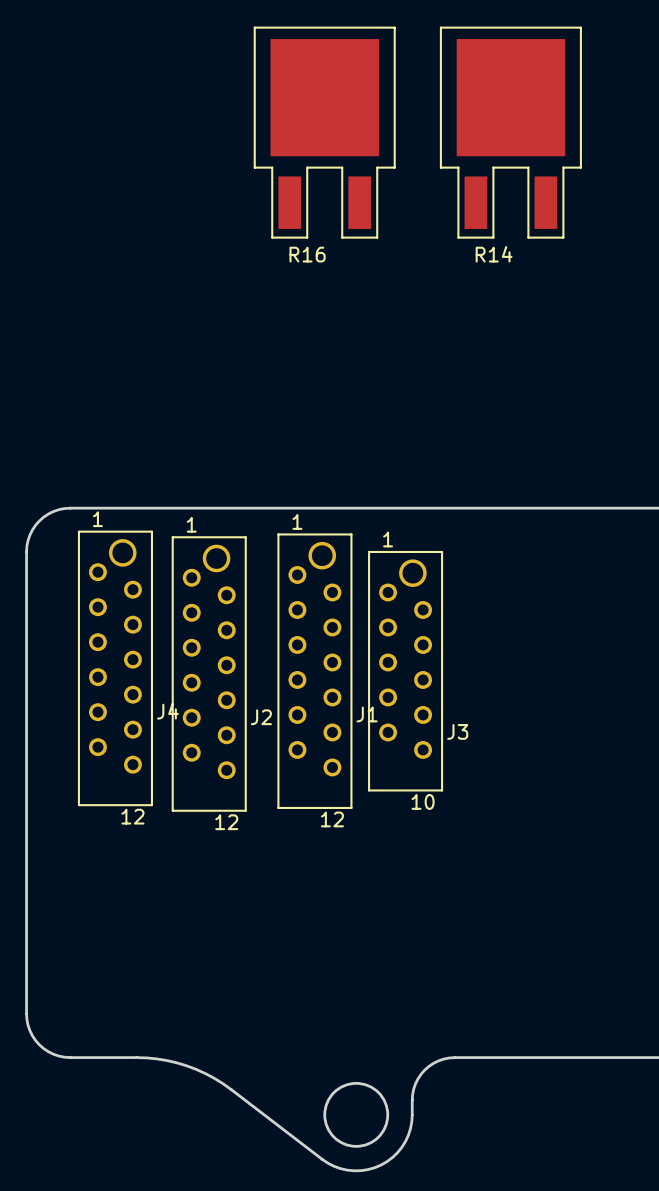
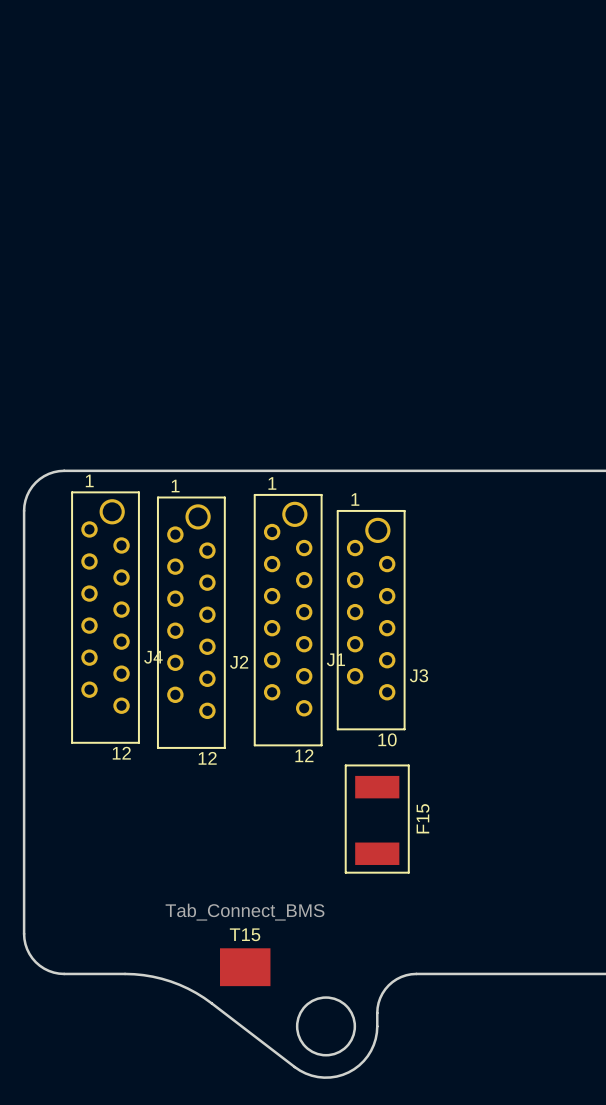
R16: (324, 132) -> none
R14: (510, 132) -> none
F15: none -> (377, 819)
T15: none -> Tab_Connect_BMS (245, 967)

